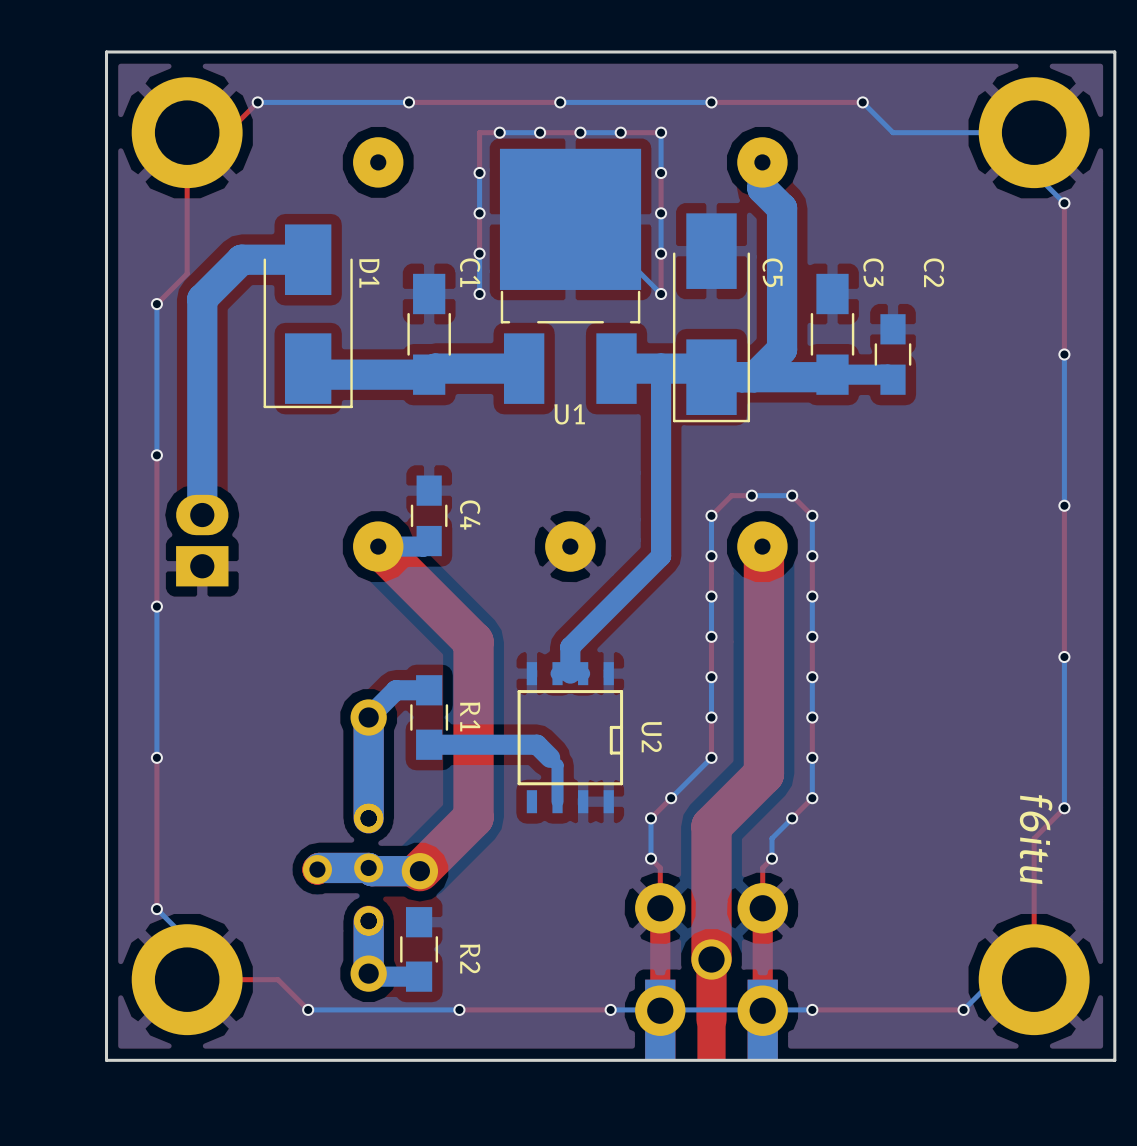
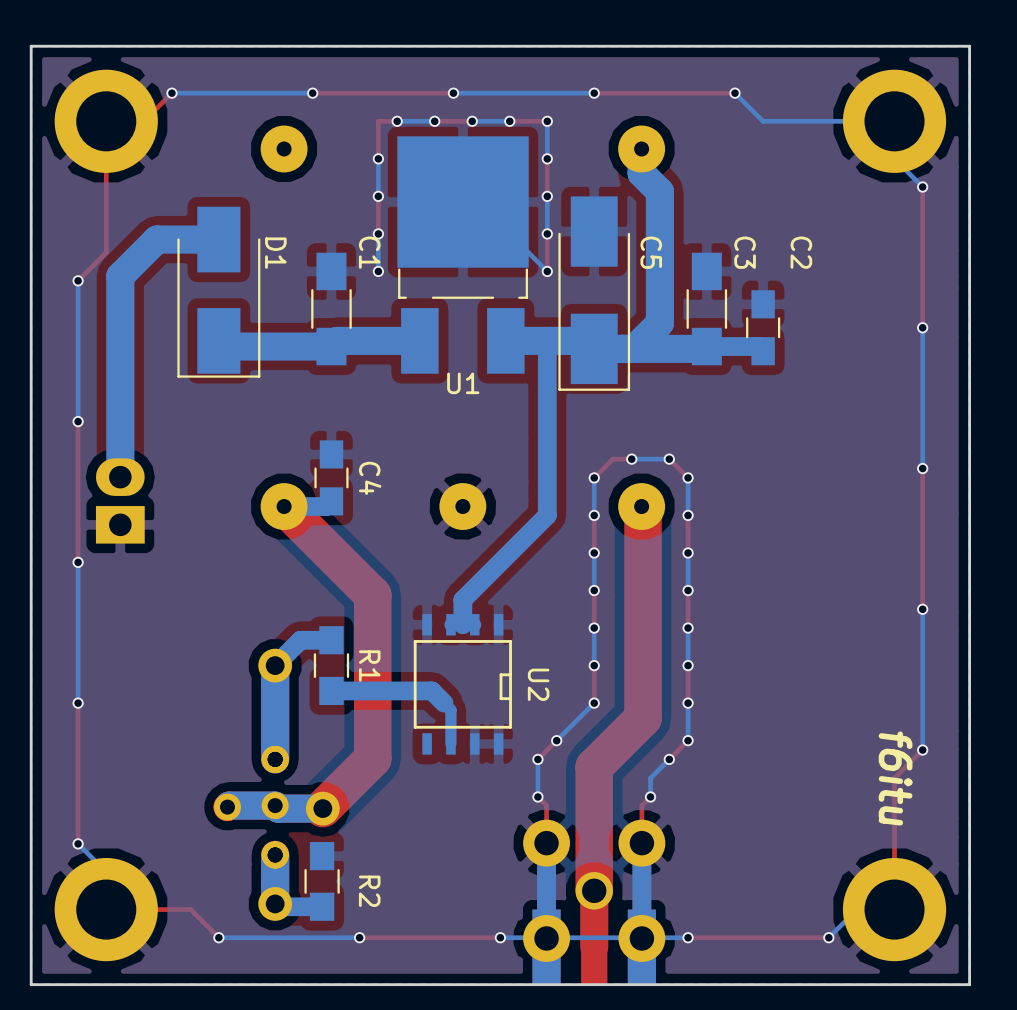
bottom track: none -> (546, 843) (546, 938)
bottom track: none -> (641, 843) (641, 938)

